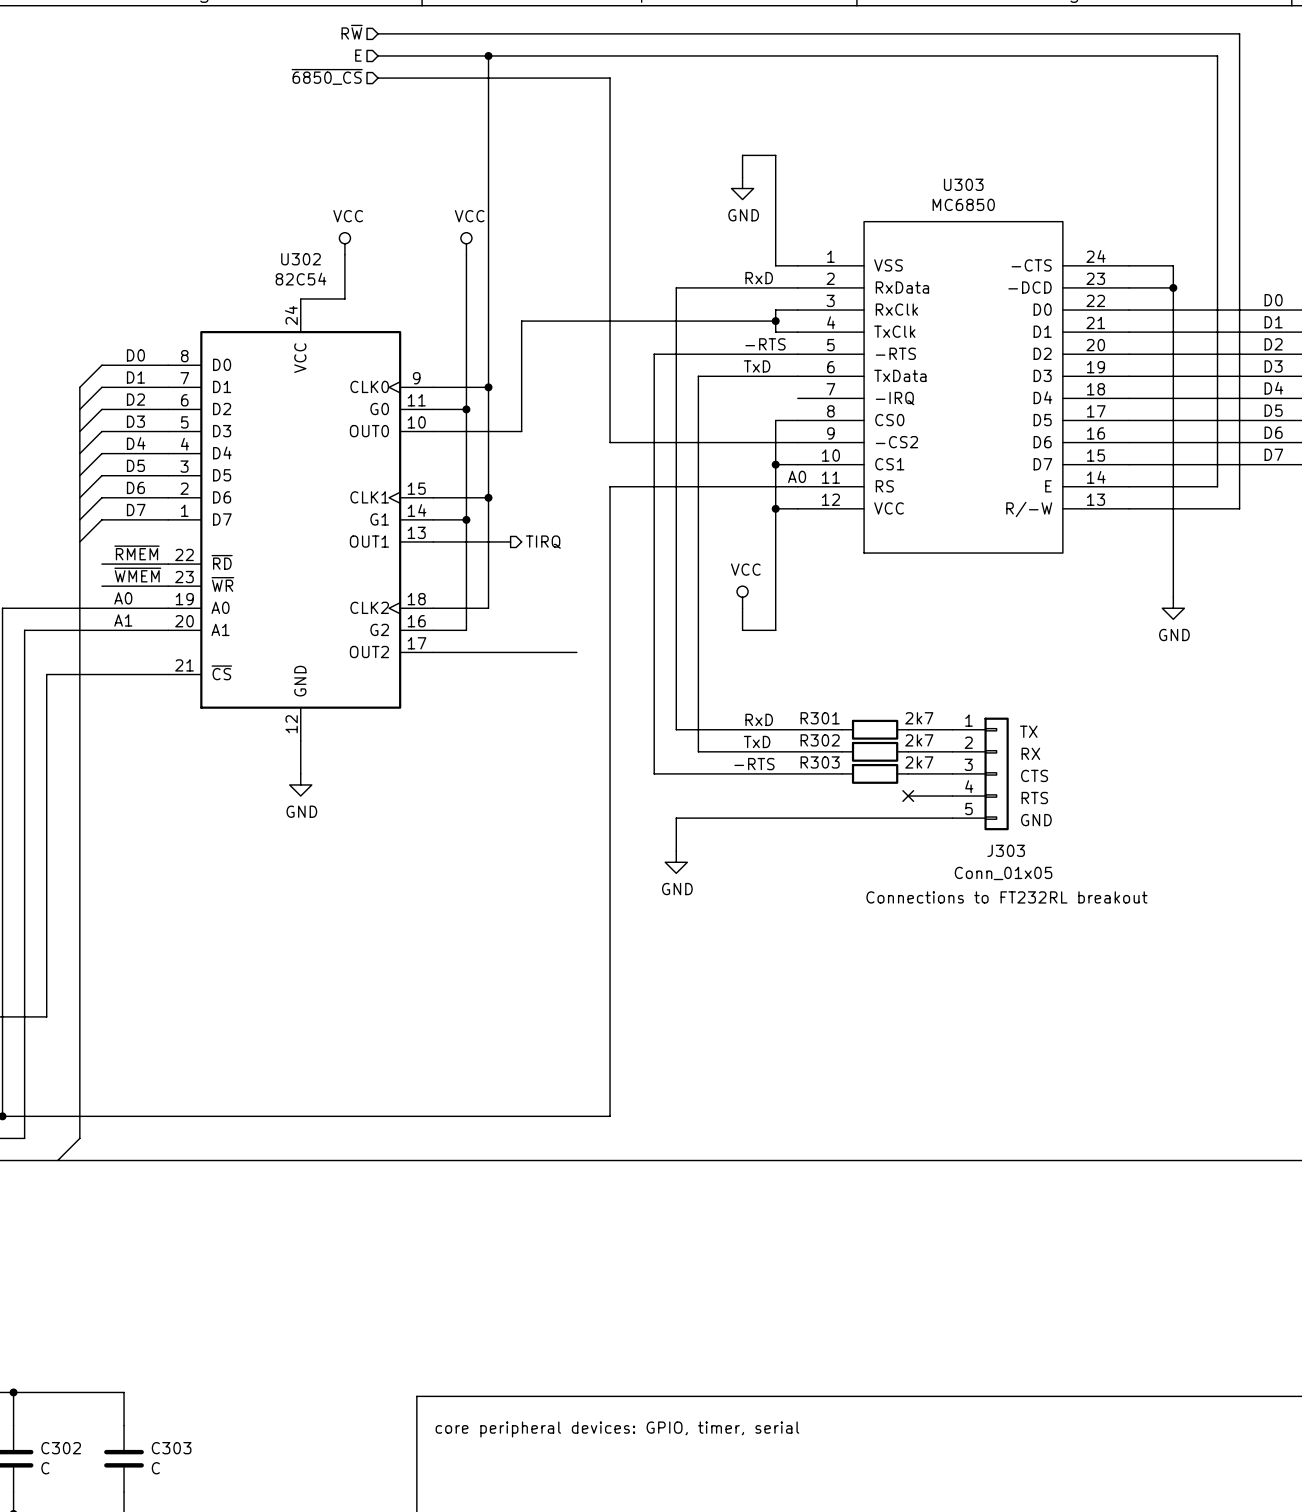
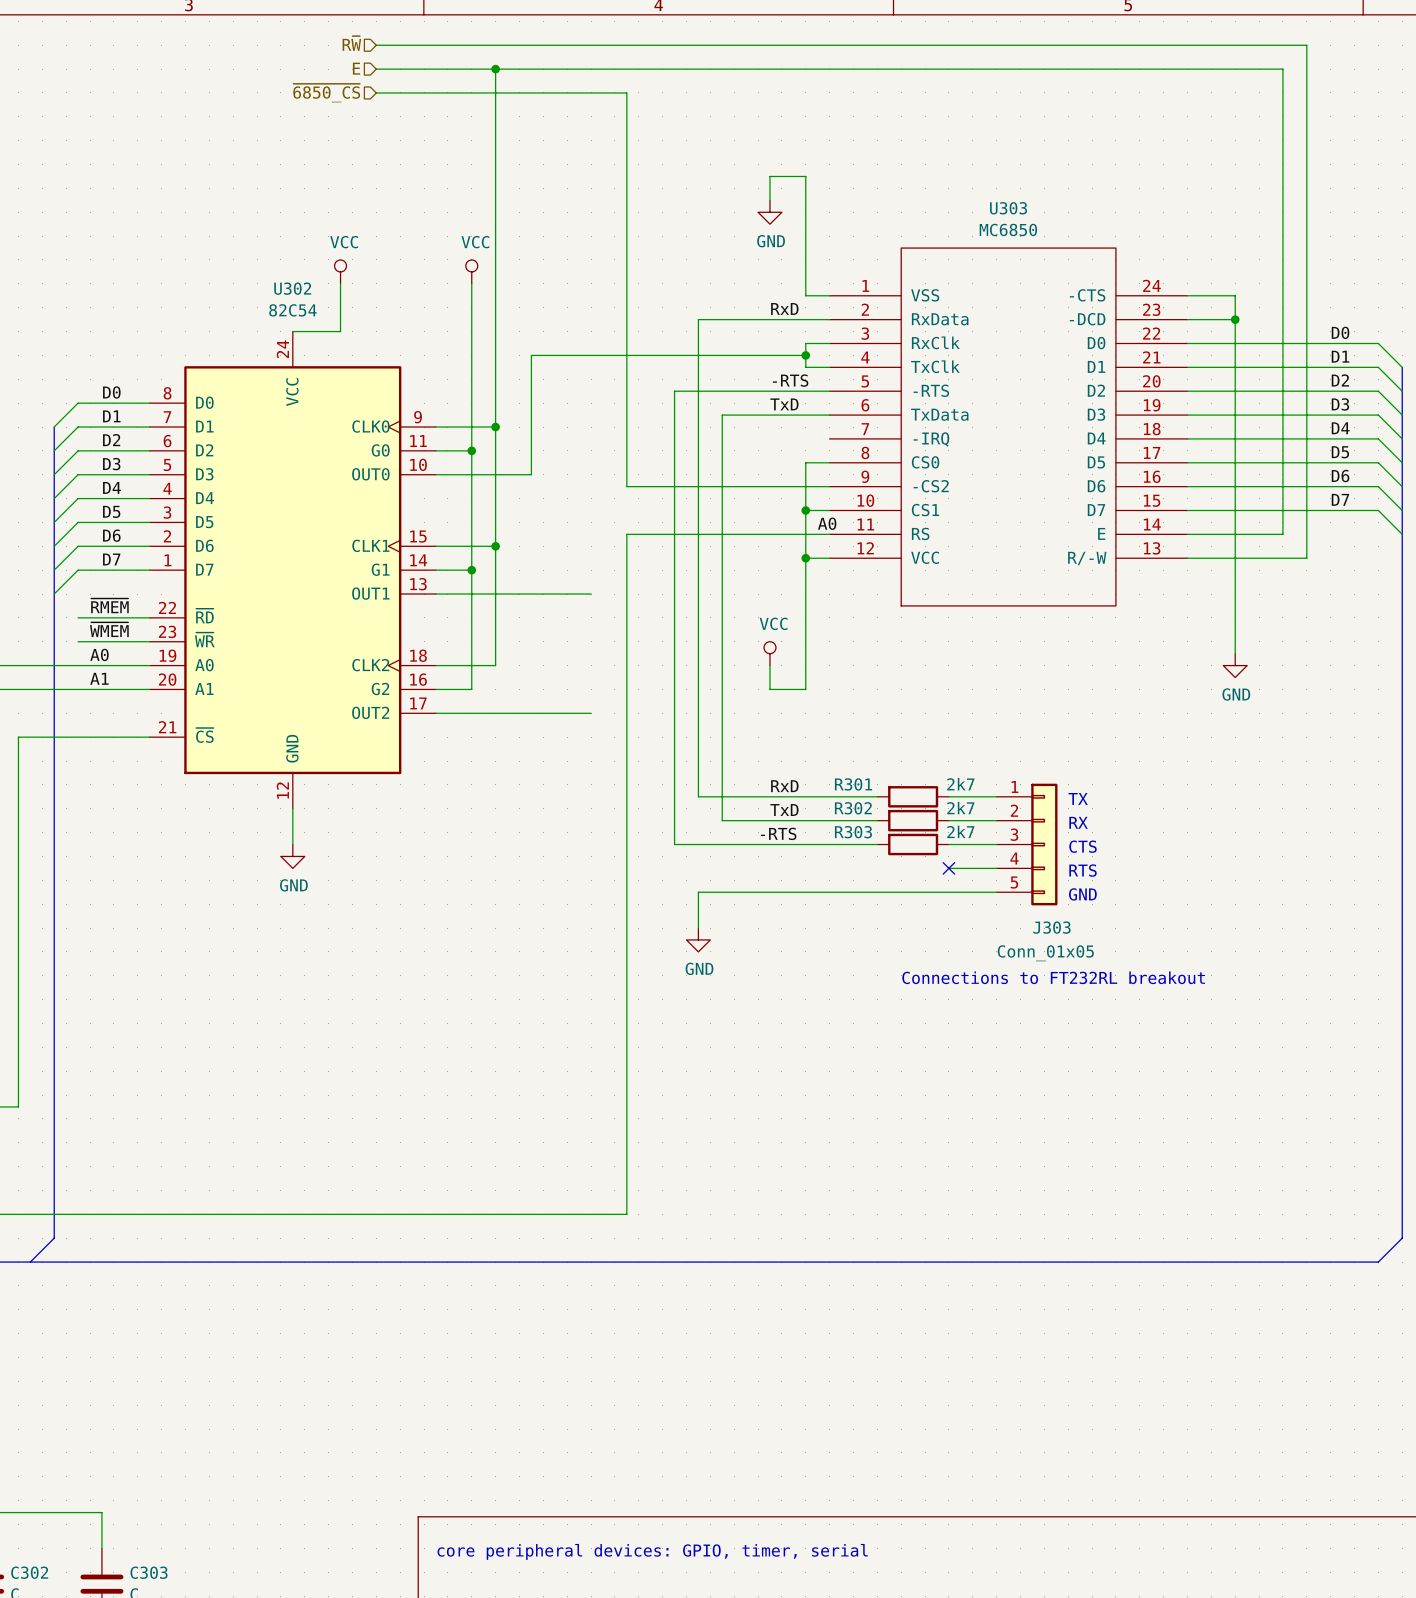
wire: none -> (519, 594) (591, 594)
hierarchical label: TIRQ (543, 542) -> none

